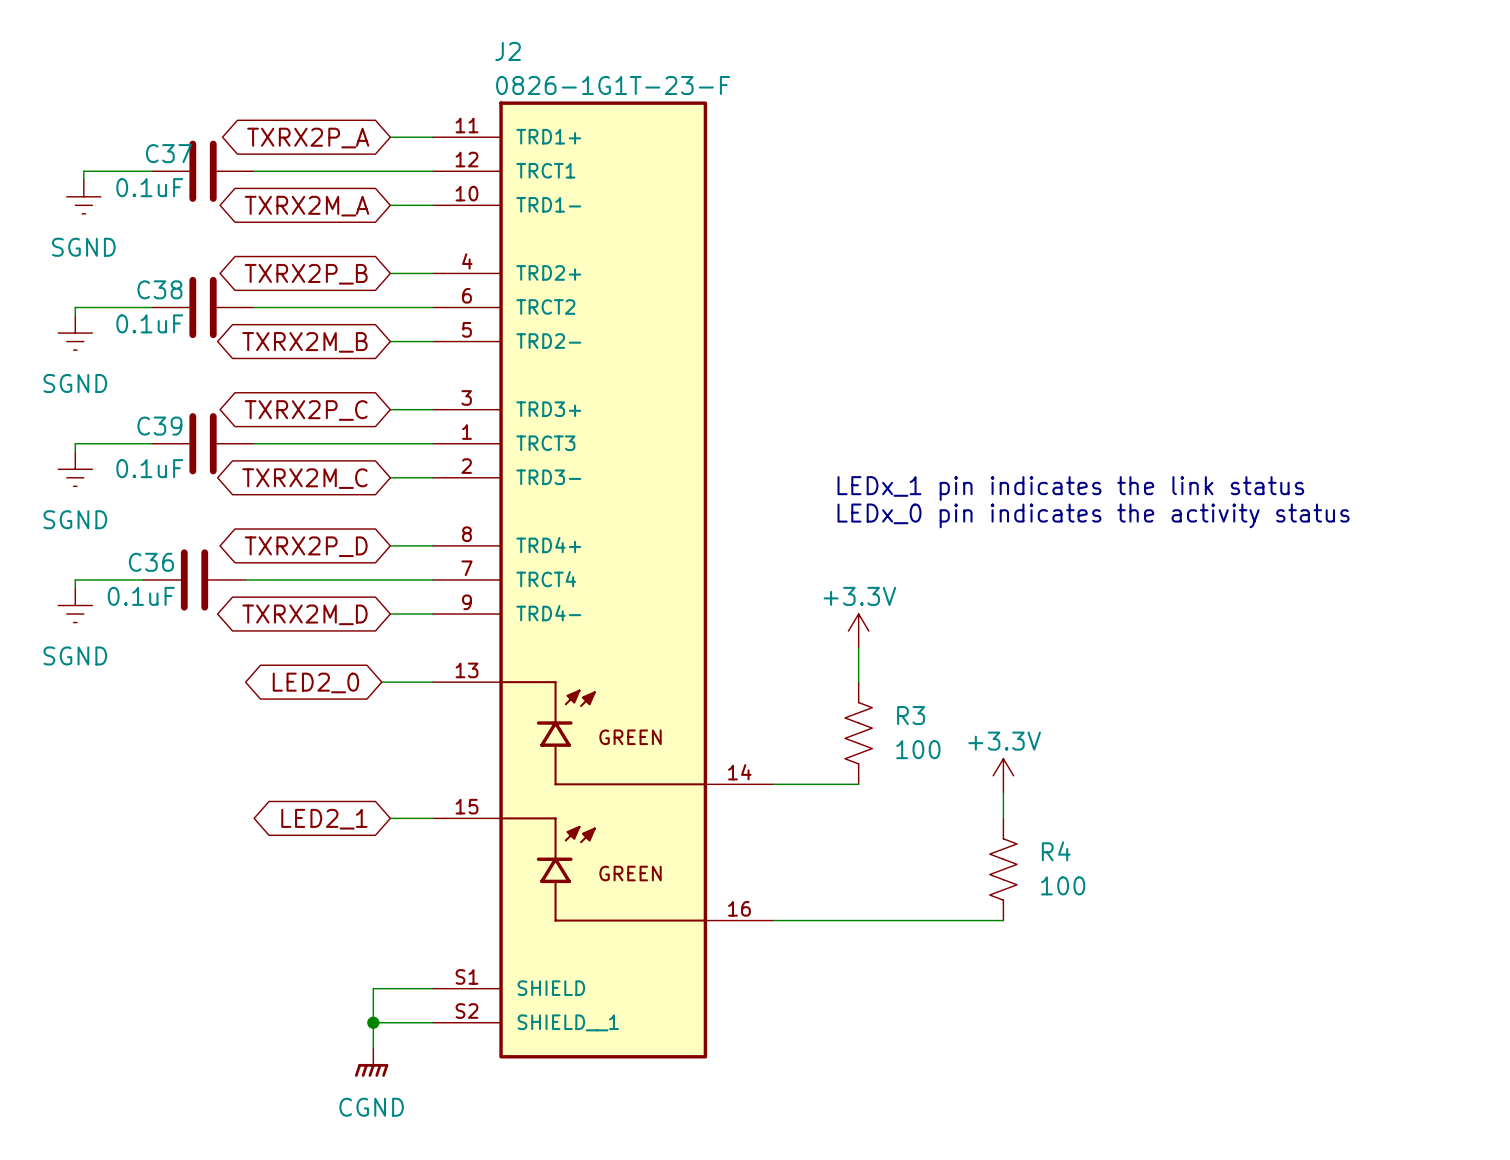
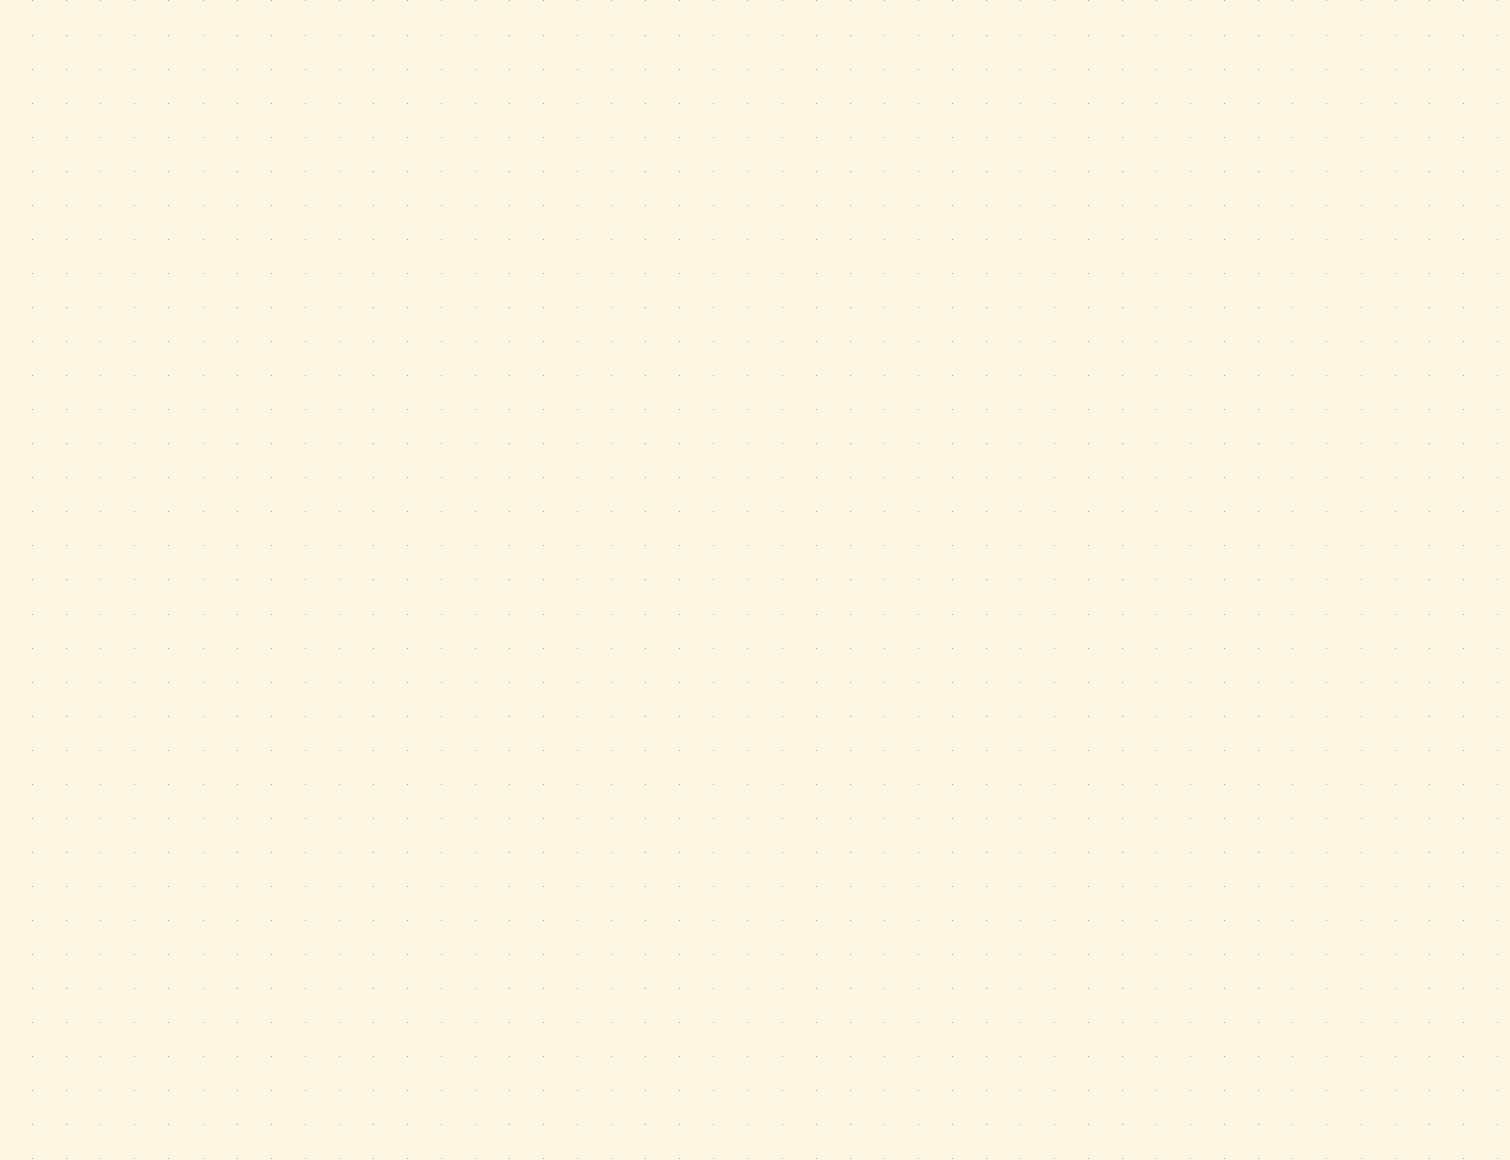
wire: (390, 137) (432, 137) -> none
global label: TXRX2P_A (308, 138) -> none
wire: (151, 171) (83, 171) (83, 179) -> none
C37: 0.1uF (203, 171) -> none
wire: (254, 171) (432, 171) -> none
power symbol: SGND (83, 196) -> none
wire: (390, 205) (432, 205) -> none
global label: TXRX2M_A (307, 206) -> none
wire: (390, 273) (432, 273) -> none
global label: TXRX2P_B (306, 274) -> none
wire: (151, 307) (75, 307) (75, 316) -> none
C38: 0.1uF (203, 307) -> none
wire: (254, 307) (432, 307) -> none
power symbol: SGND (75, 333) -> none
wire: (390, 341) (432, 341) -> none
global label: TXRX2M_B (304, 342) -> none
wire: (390, 409) (432, 409) -> none
global label: TXRX2P_C (306, 410) -> none
wire: (151, 443) (75, 443) (75, 452) -> none
C39: 0.1uF (203, 443) -> none
wire: (254, 443) (432, 443) -> none
power symbol: SGND (75, 469) -> none
wire: (390, 477) (432, 477) -> none
global label: TXRX2M_C (304, 478) -> none
text: LEDx_1 pin indicates the link status (1070, 488) -> none
text: LEDx_0 pin indicates the activity status (1093, 515) -> none
wire: (390, 545) (432, 545) -> none
global label: TXRX2P_D (306, 546) -> none
wire: (143, 579) (75, 579) (75, 588) -> none
C36: 0.1uF (194, 579) -> none
wire: (245, 579) (432, 579) -> none
J2: 0826-1G1T-23-F (603, 579) -> none
power symbol: SGND (75, 605) -> none
global label: TXRX2M_D (304, 614) -> none
wire: (390, 614) (432, 614) -> none
power symbol: +3.3V (858, 631) -> none
wire: (858, 648) (858, 682) -> none
global label: LED2_0 (315, 682) -> none
wire: (381, 682) (432, 682) -> none
R3: 100 (858, 733) -> none
power symbol: +3.3V (1003, 775) -> none
wire: (773, 784) (858, 784) -> none
wire: (1003, 792) (1003, 818) -> none
wire: (390, 818) (432, 818) -> none
global label: LED2_1 (324, 819) -> none
R4: 100 (1003, 869) -> none
wire: (773, 920) (1003, 920) -> none
wire: (432, 988) (373, 988) (373, 1048) -> none
wire: (373, 1022) (432, 1022) -> none
junction: (373, 1022) -> none
power symbol: CGND (371, 1062) -> none

